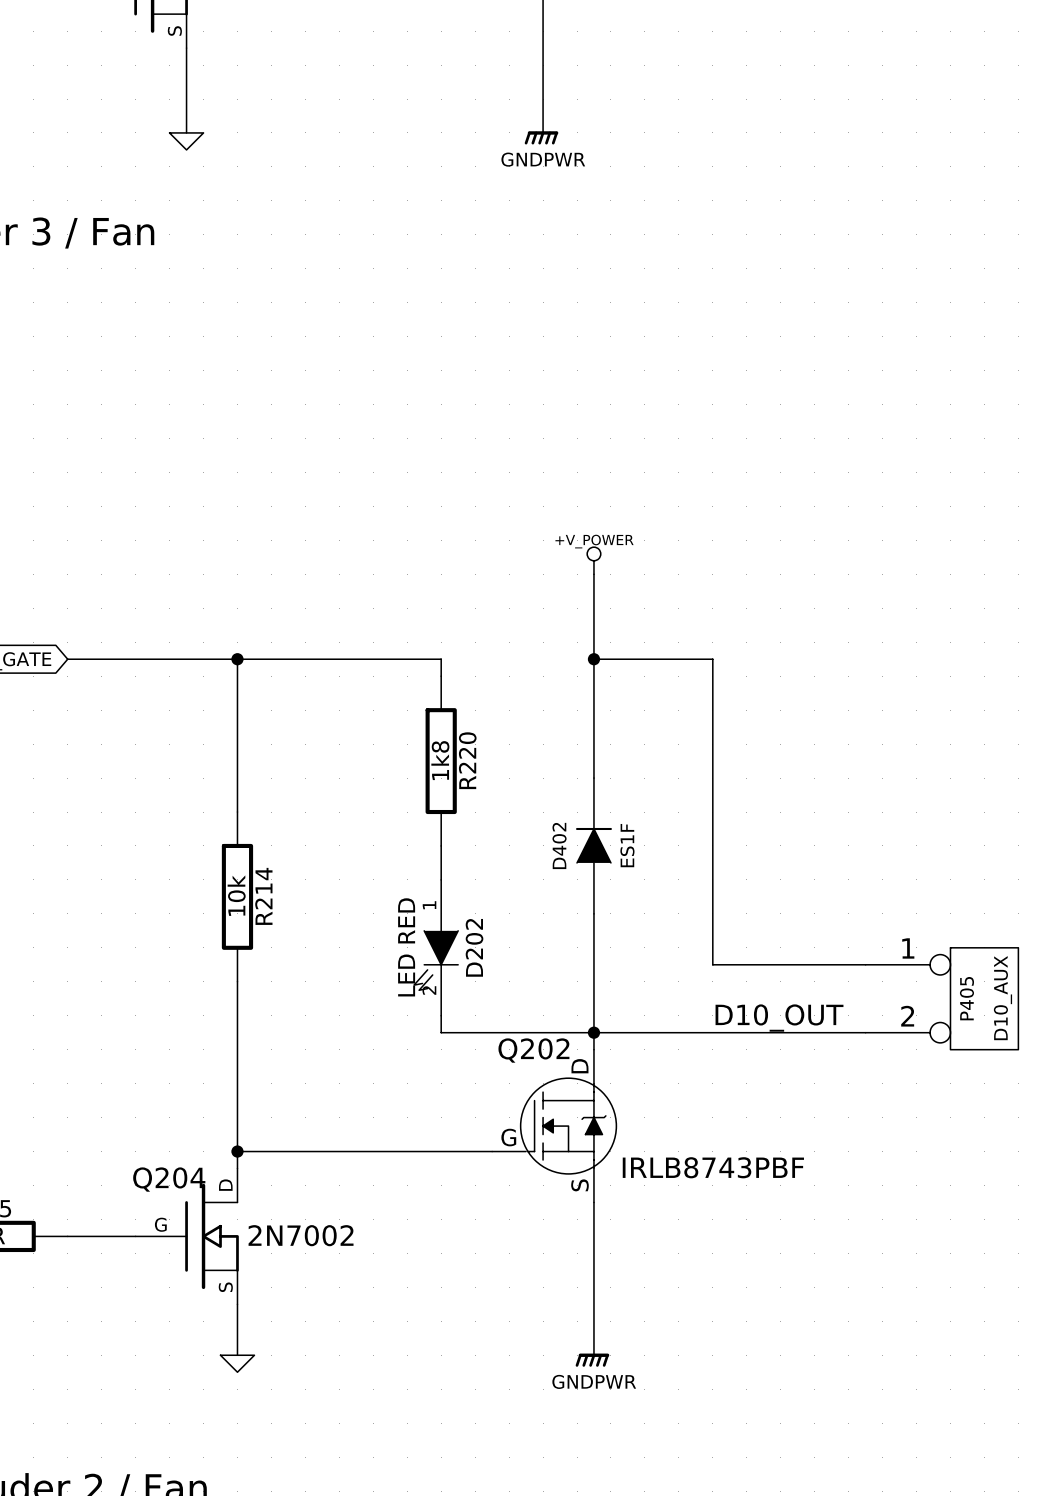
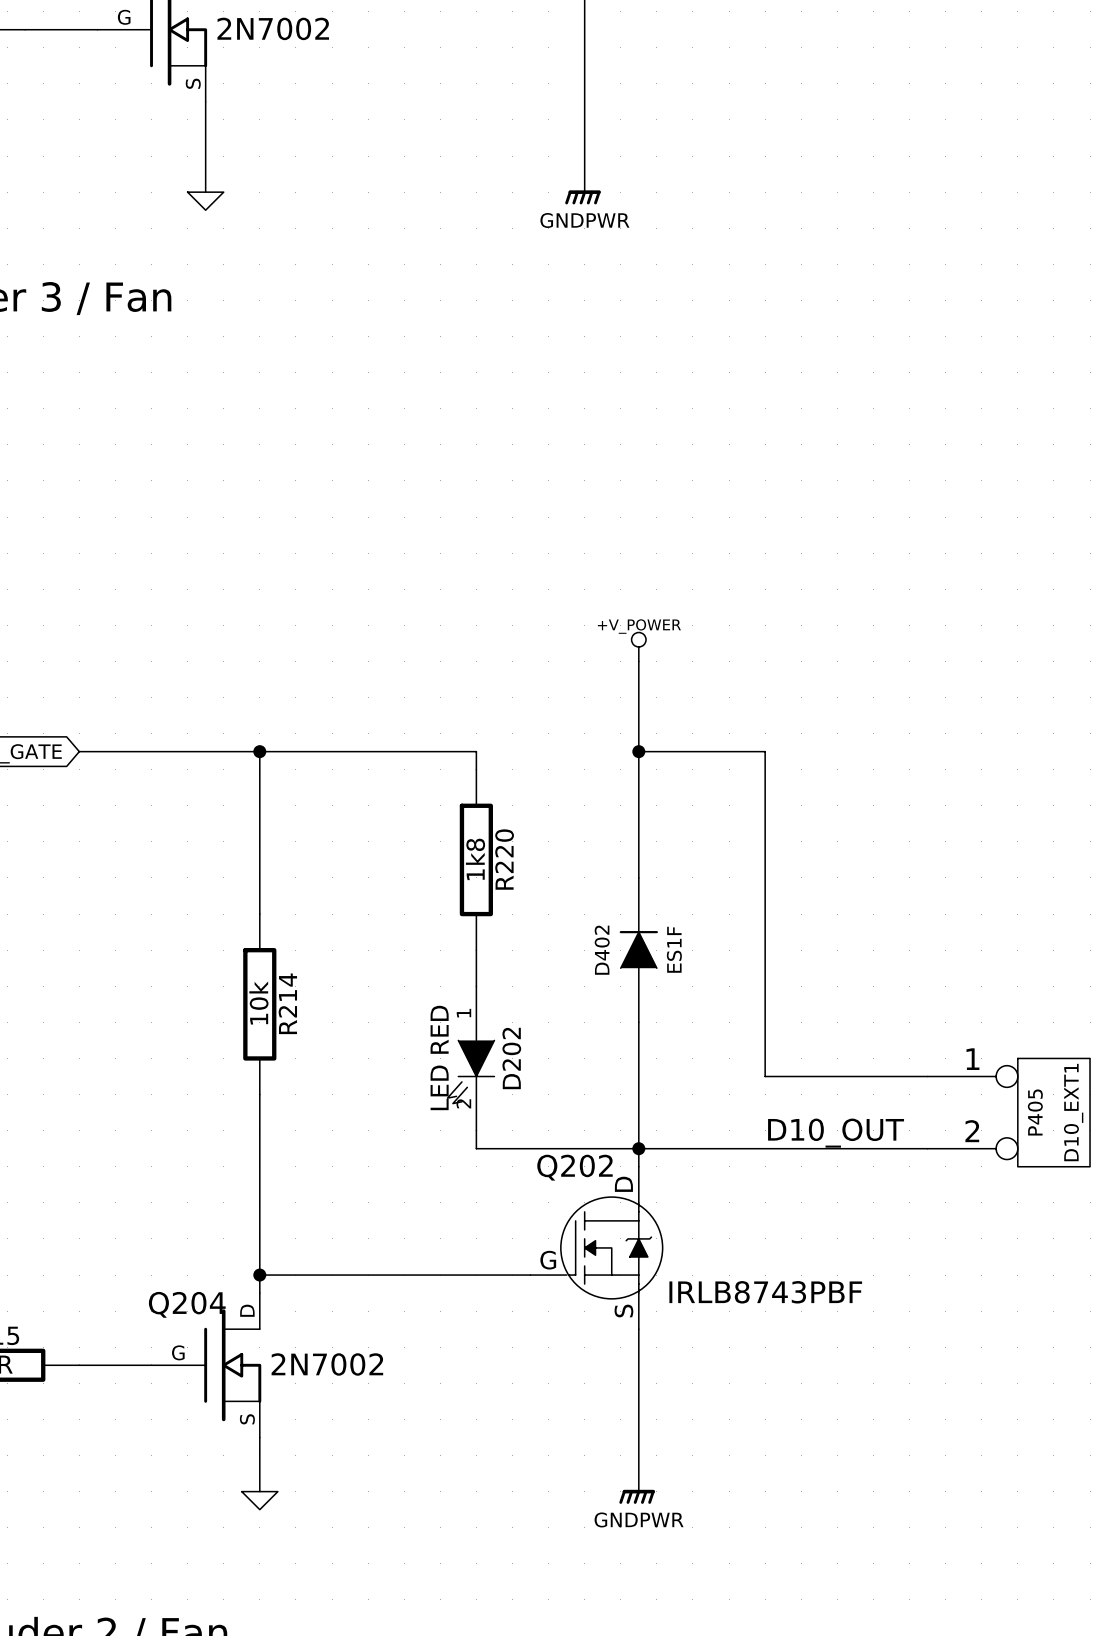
P405 value: D10_AUX (1002, 998) -> D10_EXT1 (1073, 1112)

